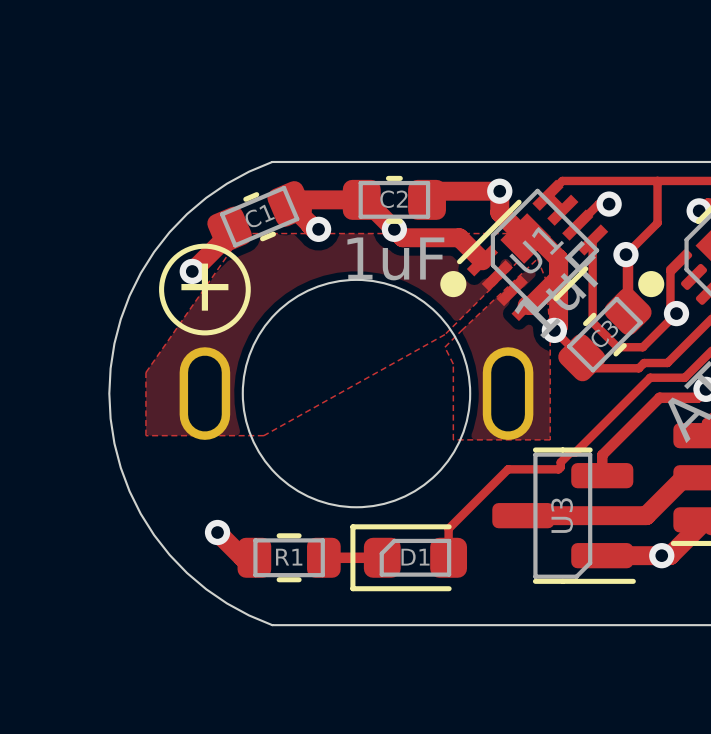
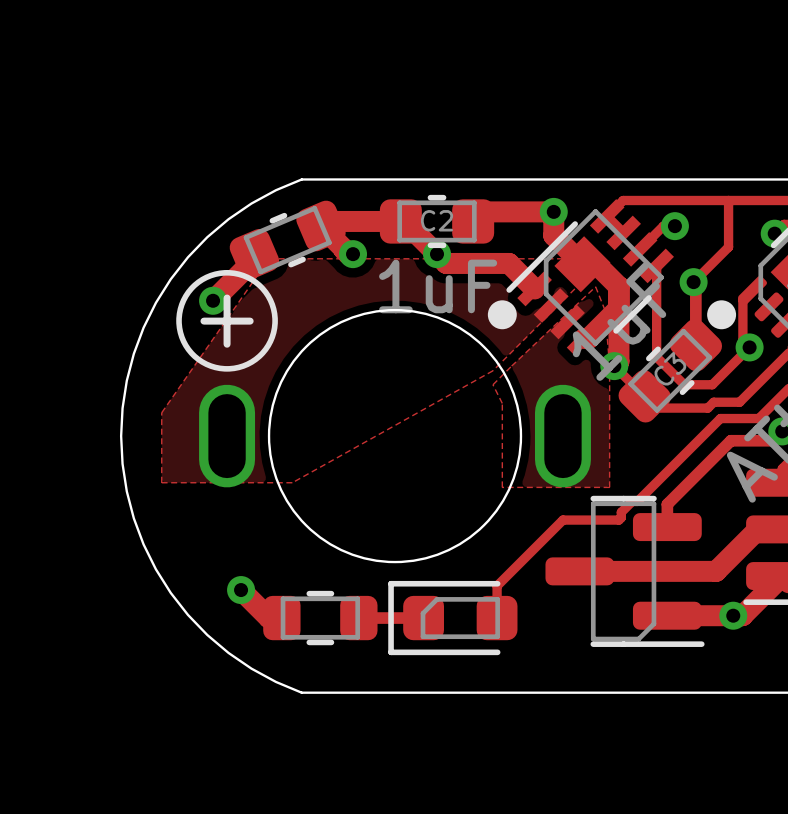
C1 name: C1 (259, 216) -> none
U1 name: U1 (536, 250) -> none
U3 name: U3 (562, 515) -> none
R1 name: R1 (289, 557) -> none
D1 name: D1 (415, 557) -> none

